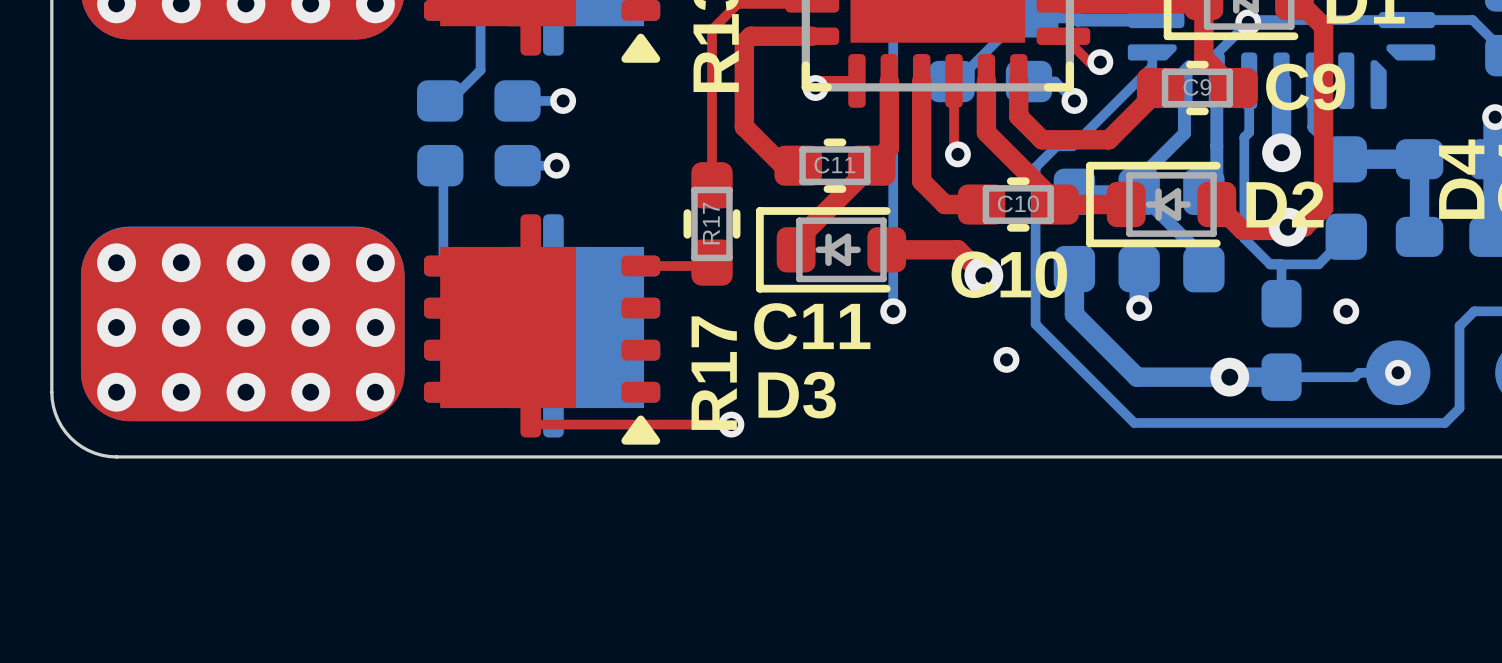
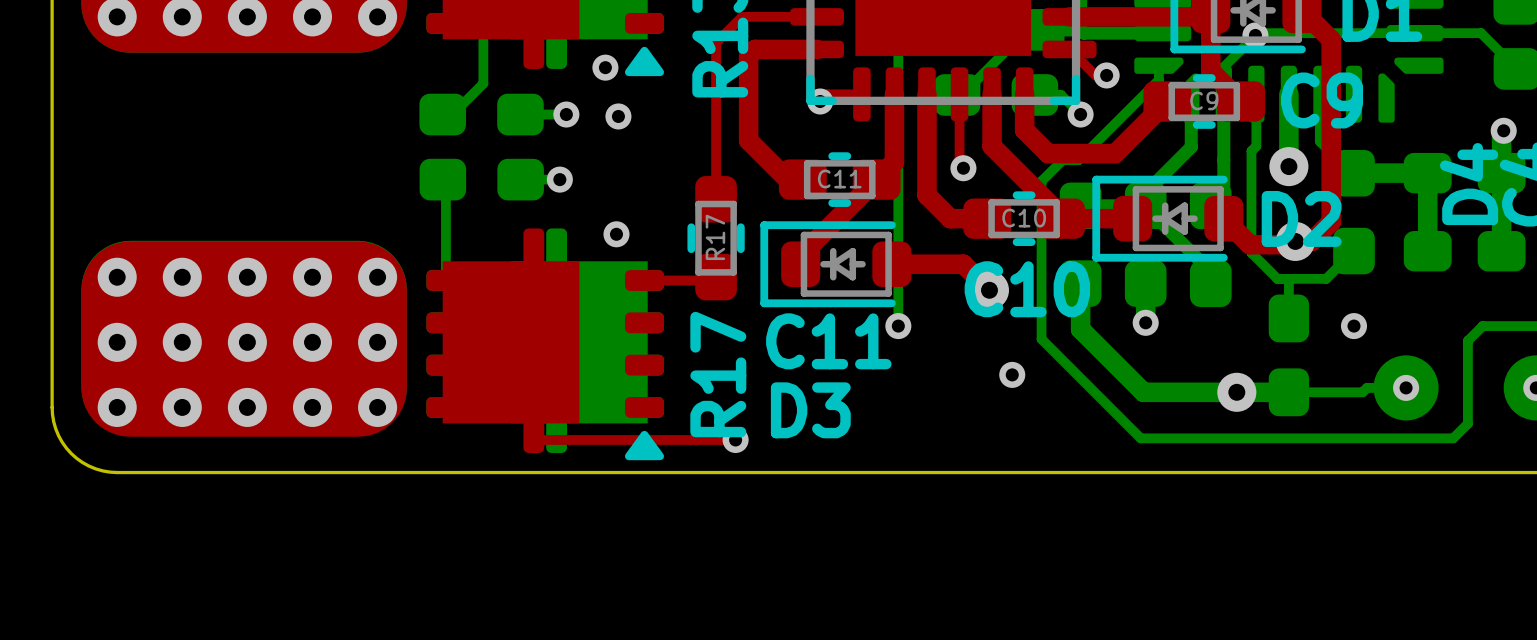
via: none -> (605, 67)
via: none -> (618, 116)
via: none -> (616, 234)

